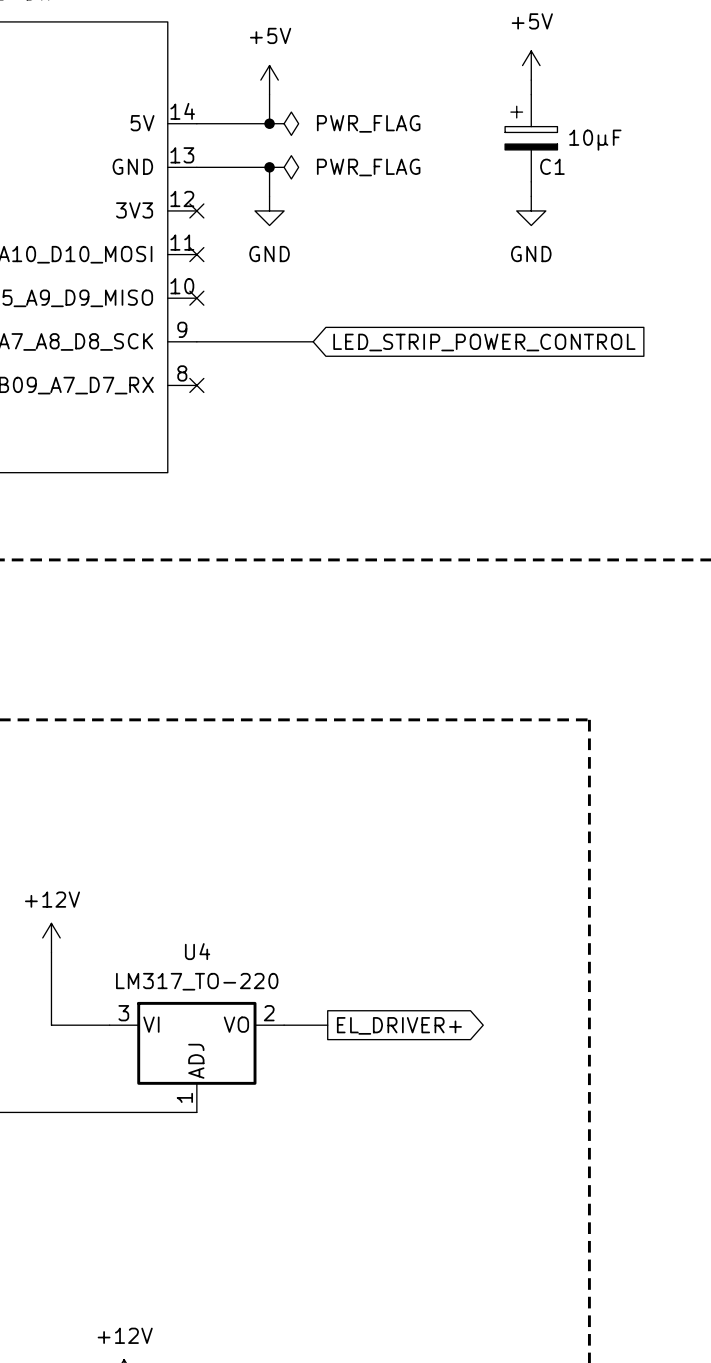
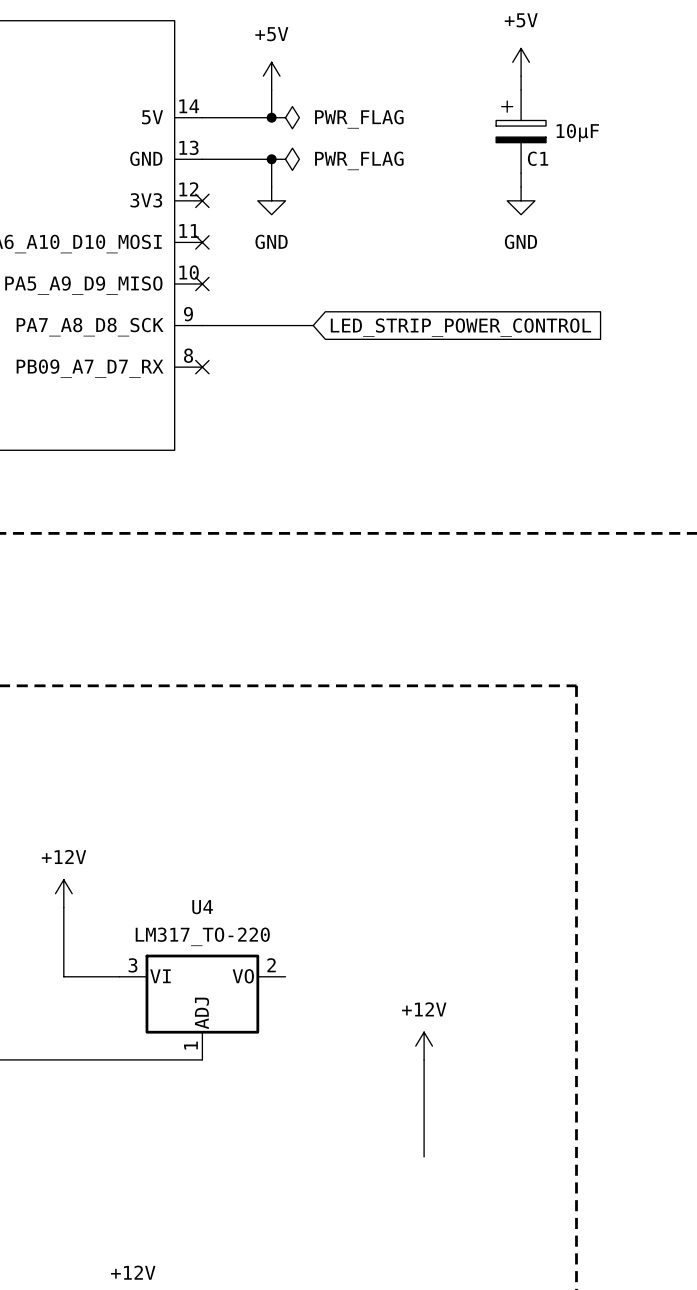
wire: (284, 1025) (327, 1025) -> none
global label: EL_DRIVER+ (399, 1025) -> none
power symbol: none -> +12V (424, 1046)
wire: none -> (424, 1059) (424, 1156)

